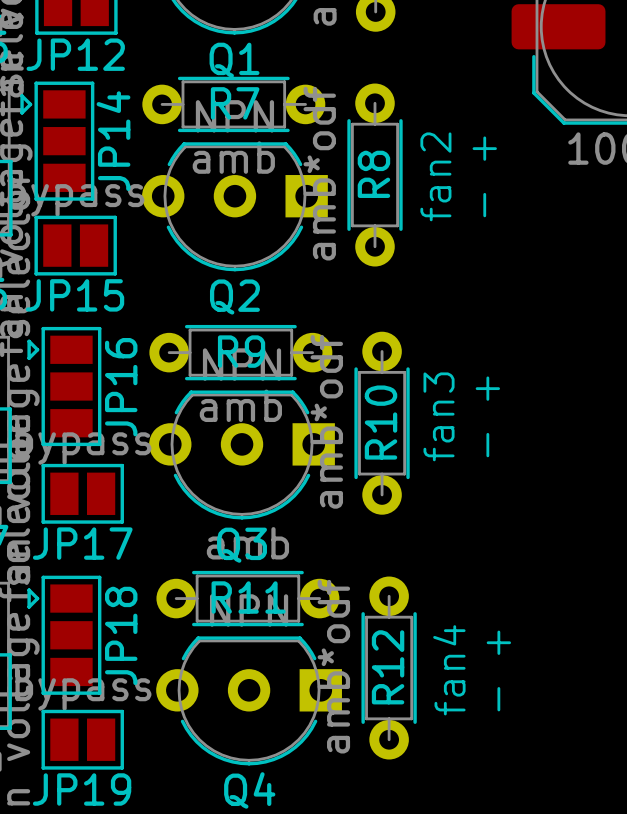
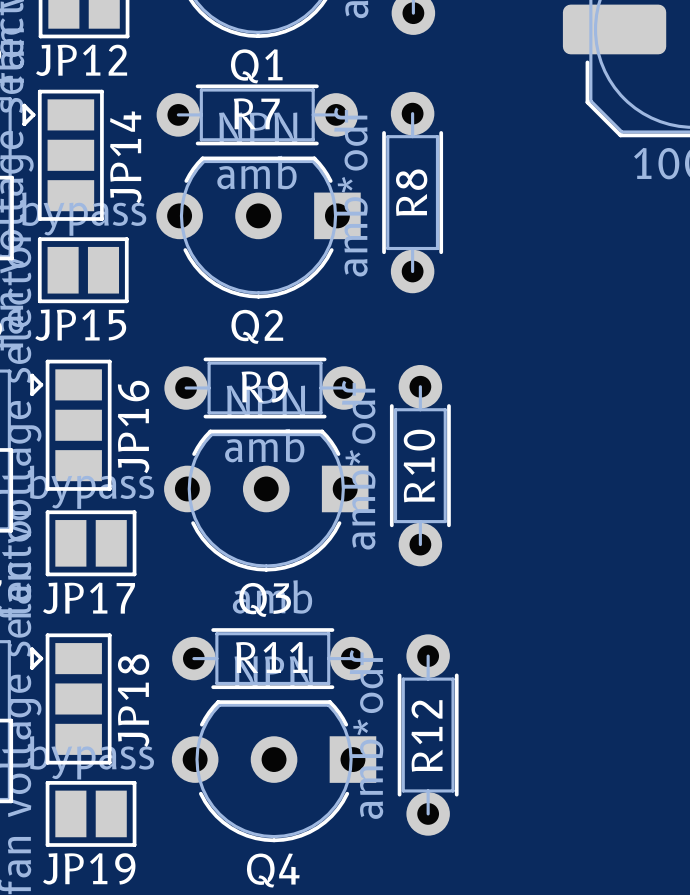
text: fan2 (435, 176) -> none
text: - + (484, 176) -> none
text: fan3 (439, 416) -> none
text: - + (487, 416) -> none
text: fan4 (449, 670) -> none
text: - + (498, 670) -> none

